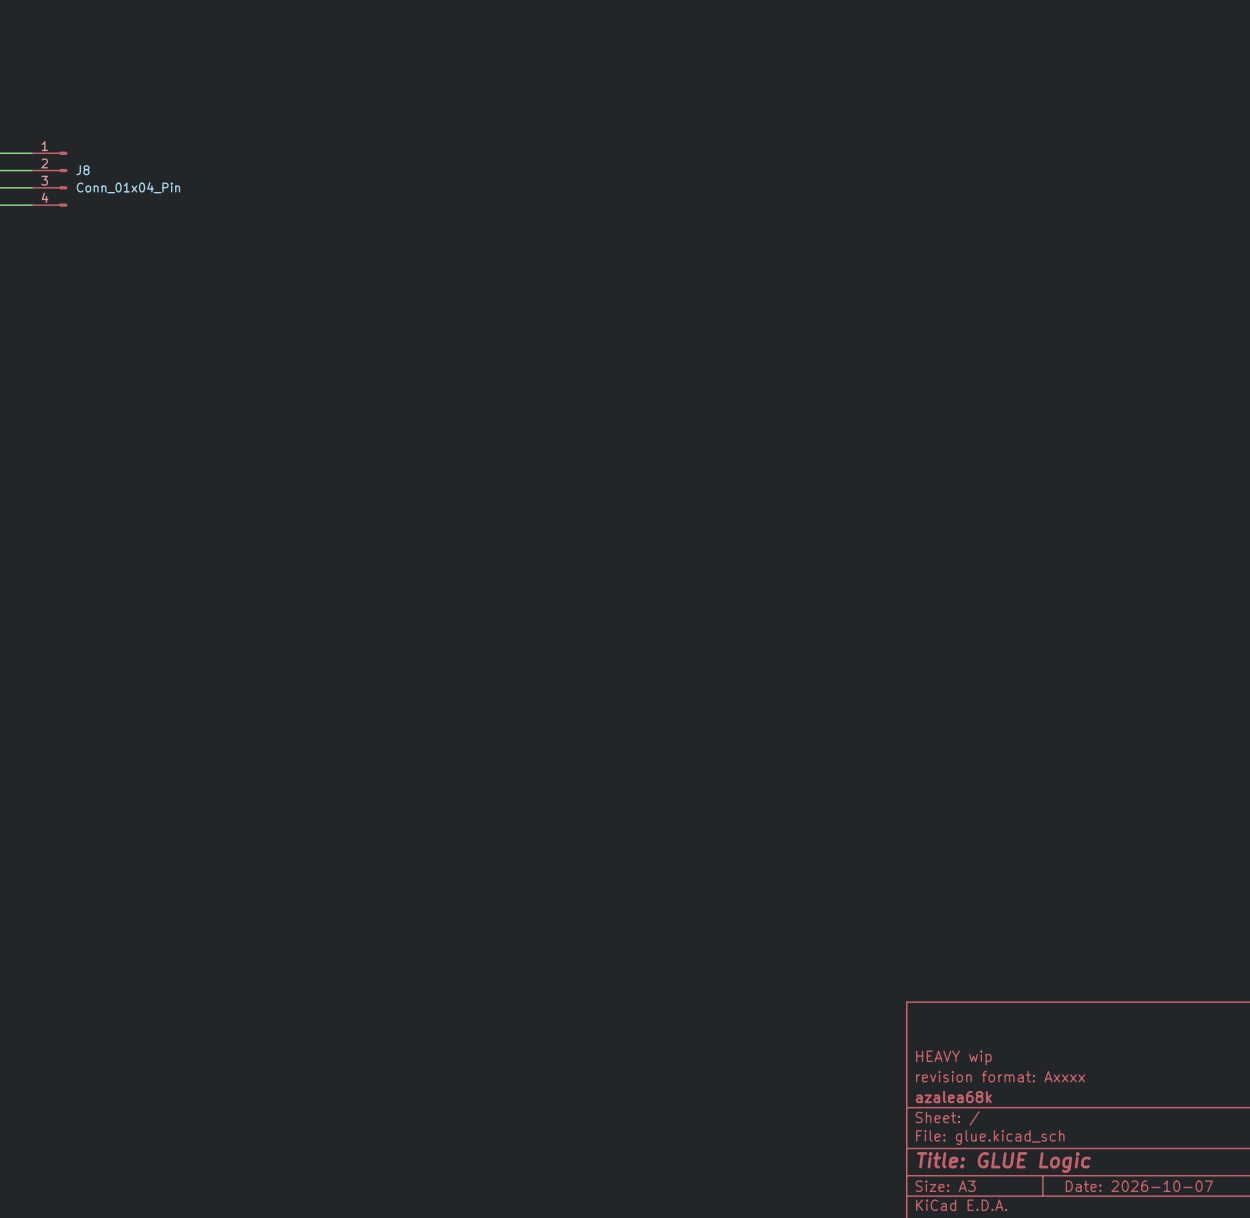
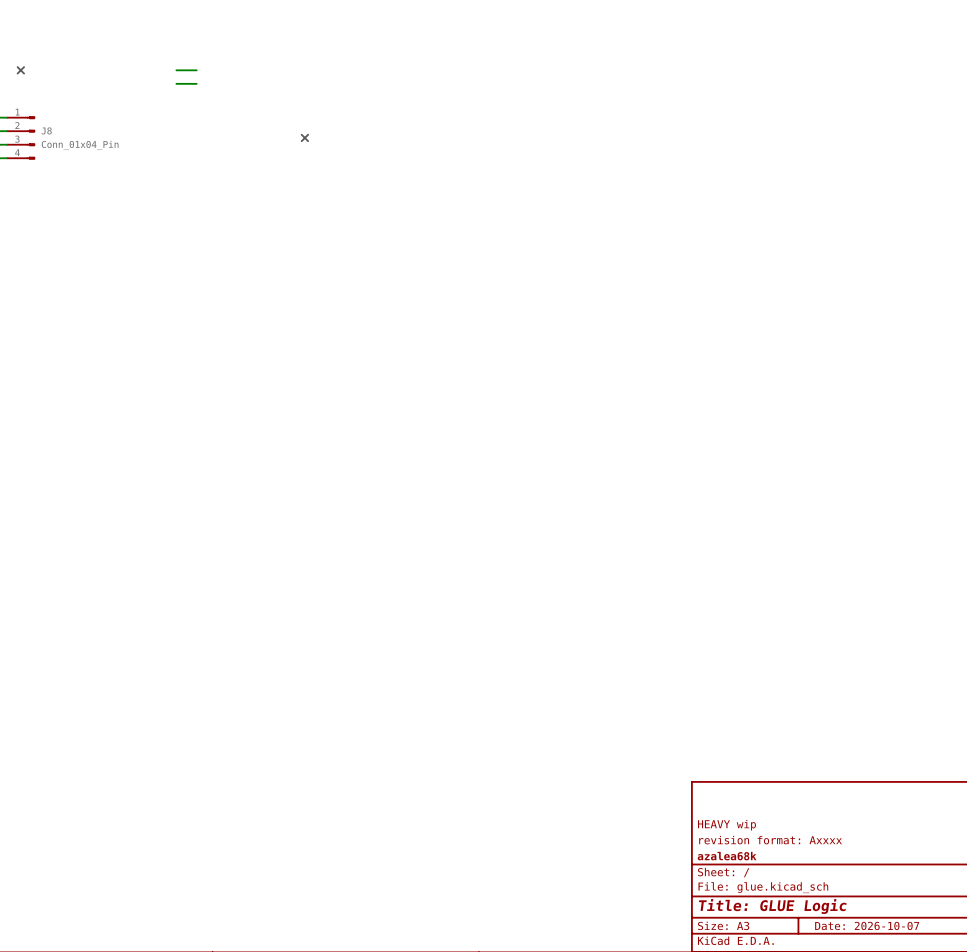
no-connect mark: none -> (20, 70)
wire: none -> (176, 70) (196, 70)
wire: none -> (176, 83) (196, 83)
no-connect mark: none -> (304, 137)

